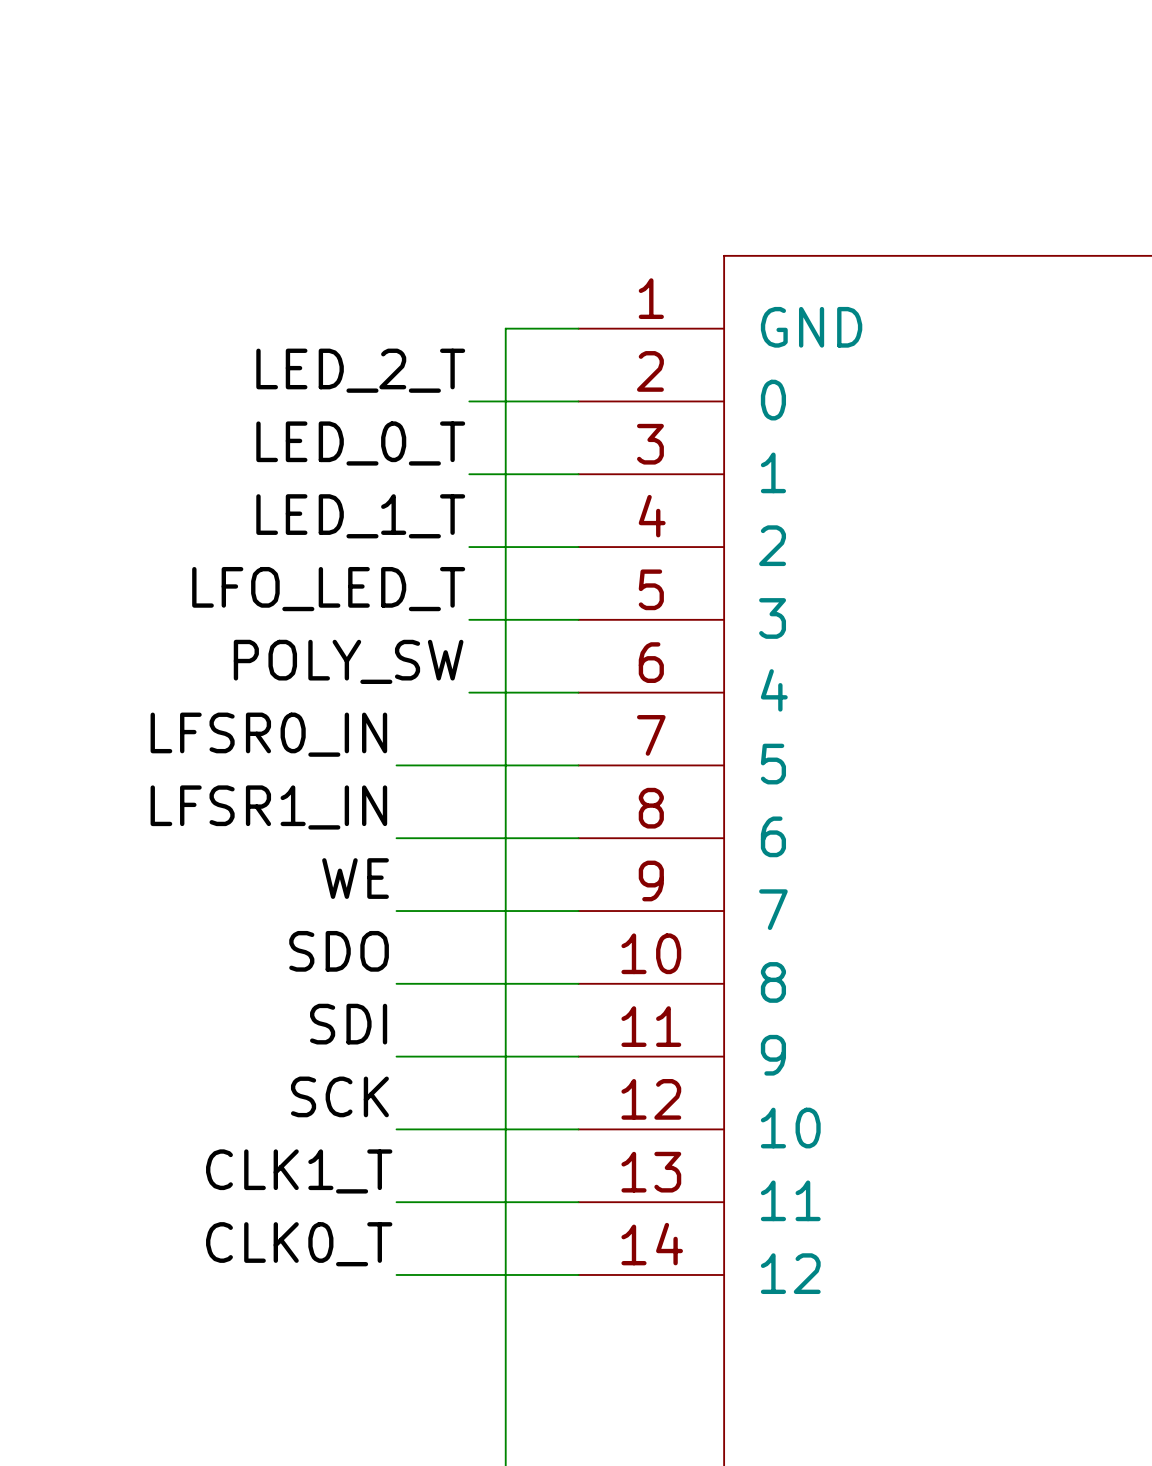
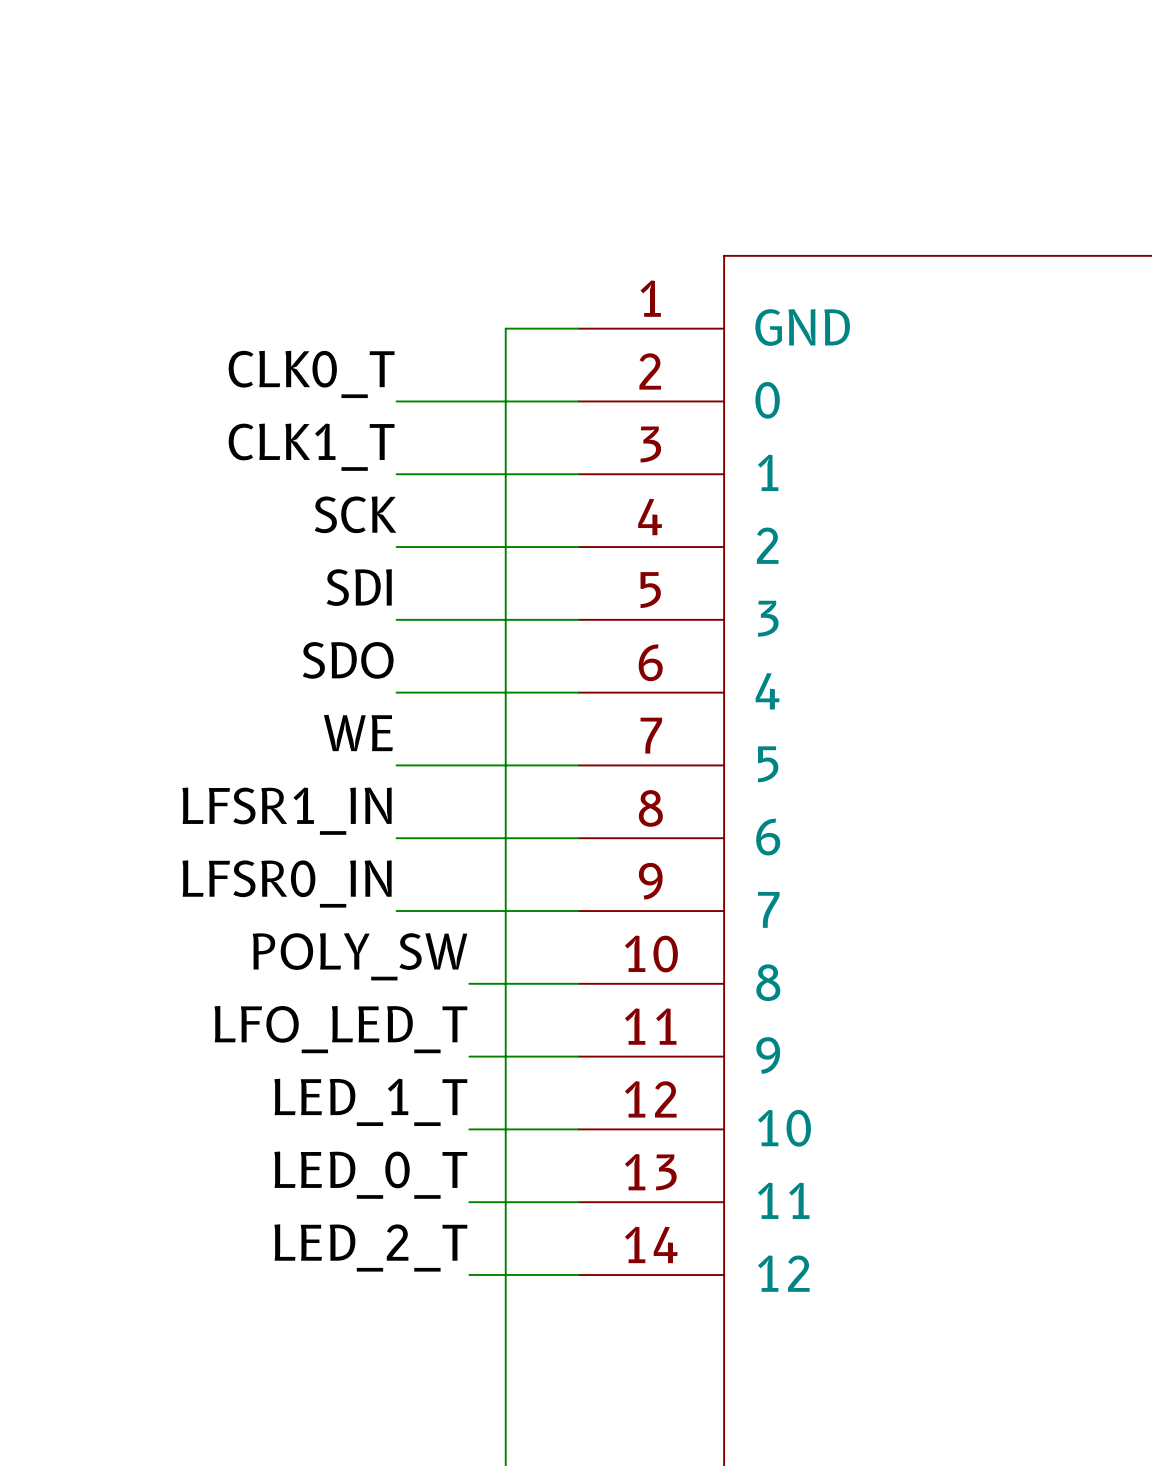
label: LED_2_T (360, 370) -> none
label: none -> CLK1_T (311, 447)
label: LED_0_T (360, 443) -> CLK0_T (311, 374)
label position: LED_1_T (360, 516) -> LED_1_T (370, 1102)
label position: LFO_LED_T (328, 589) -> LFO_LED_T (340, 1029)
label position: POLY_SW (348, 661) -> POLY_SW (360, 956)
label: LFSR0_IN (268, 734) -> WE (358, 732)
label: WE (355, 878) -> LFSR0_IN (287, 883)
label position: SDO (339, 951) -> SDO (348, 660)
wire: (396, 983) (469, 983) -> (396, 401) (469, 401)
label position: SDI (348, 1024) -> SDI (359, 587)
wire: (396, 1056) (469, 1056) -> (396, 474) (469, 474)
label position: SCK (339, 1096) -> SCK (355, 514)
wire: (396, 1129) (469, 1129) -> (396, 547) (469, 547)
label: CLK1_T (299, 1171) -> none
wire: (396, 1202) (469, 1202) -> (396, 619) (469, 619)
label: CLK0_T (299, 1244) -> LED_0_T (370, 1175)
label: none -> LED_2_T (370, 1247)
wire: (396, 1274) (469, 1274) -> (396, 692) (469, 692)

